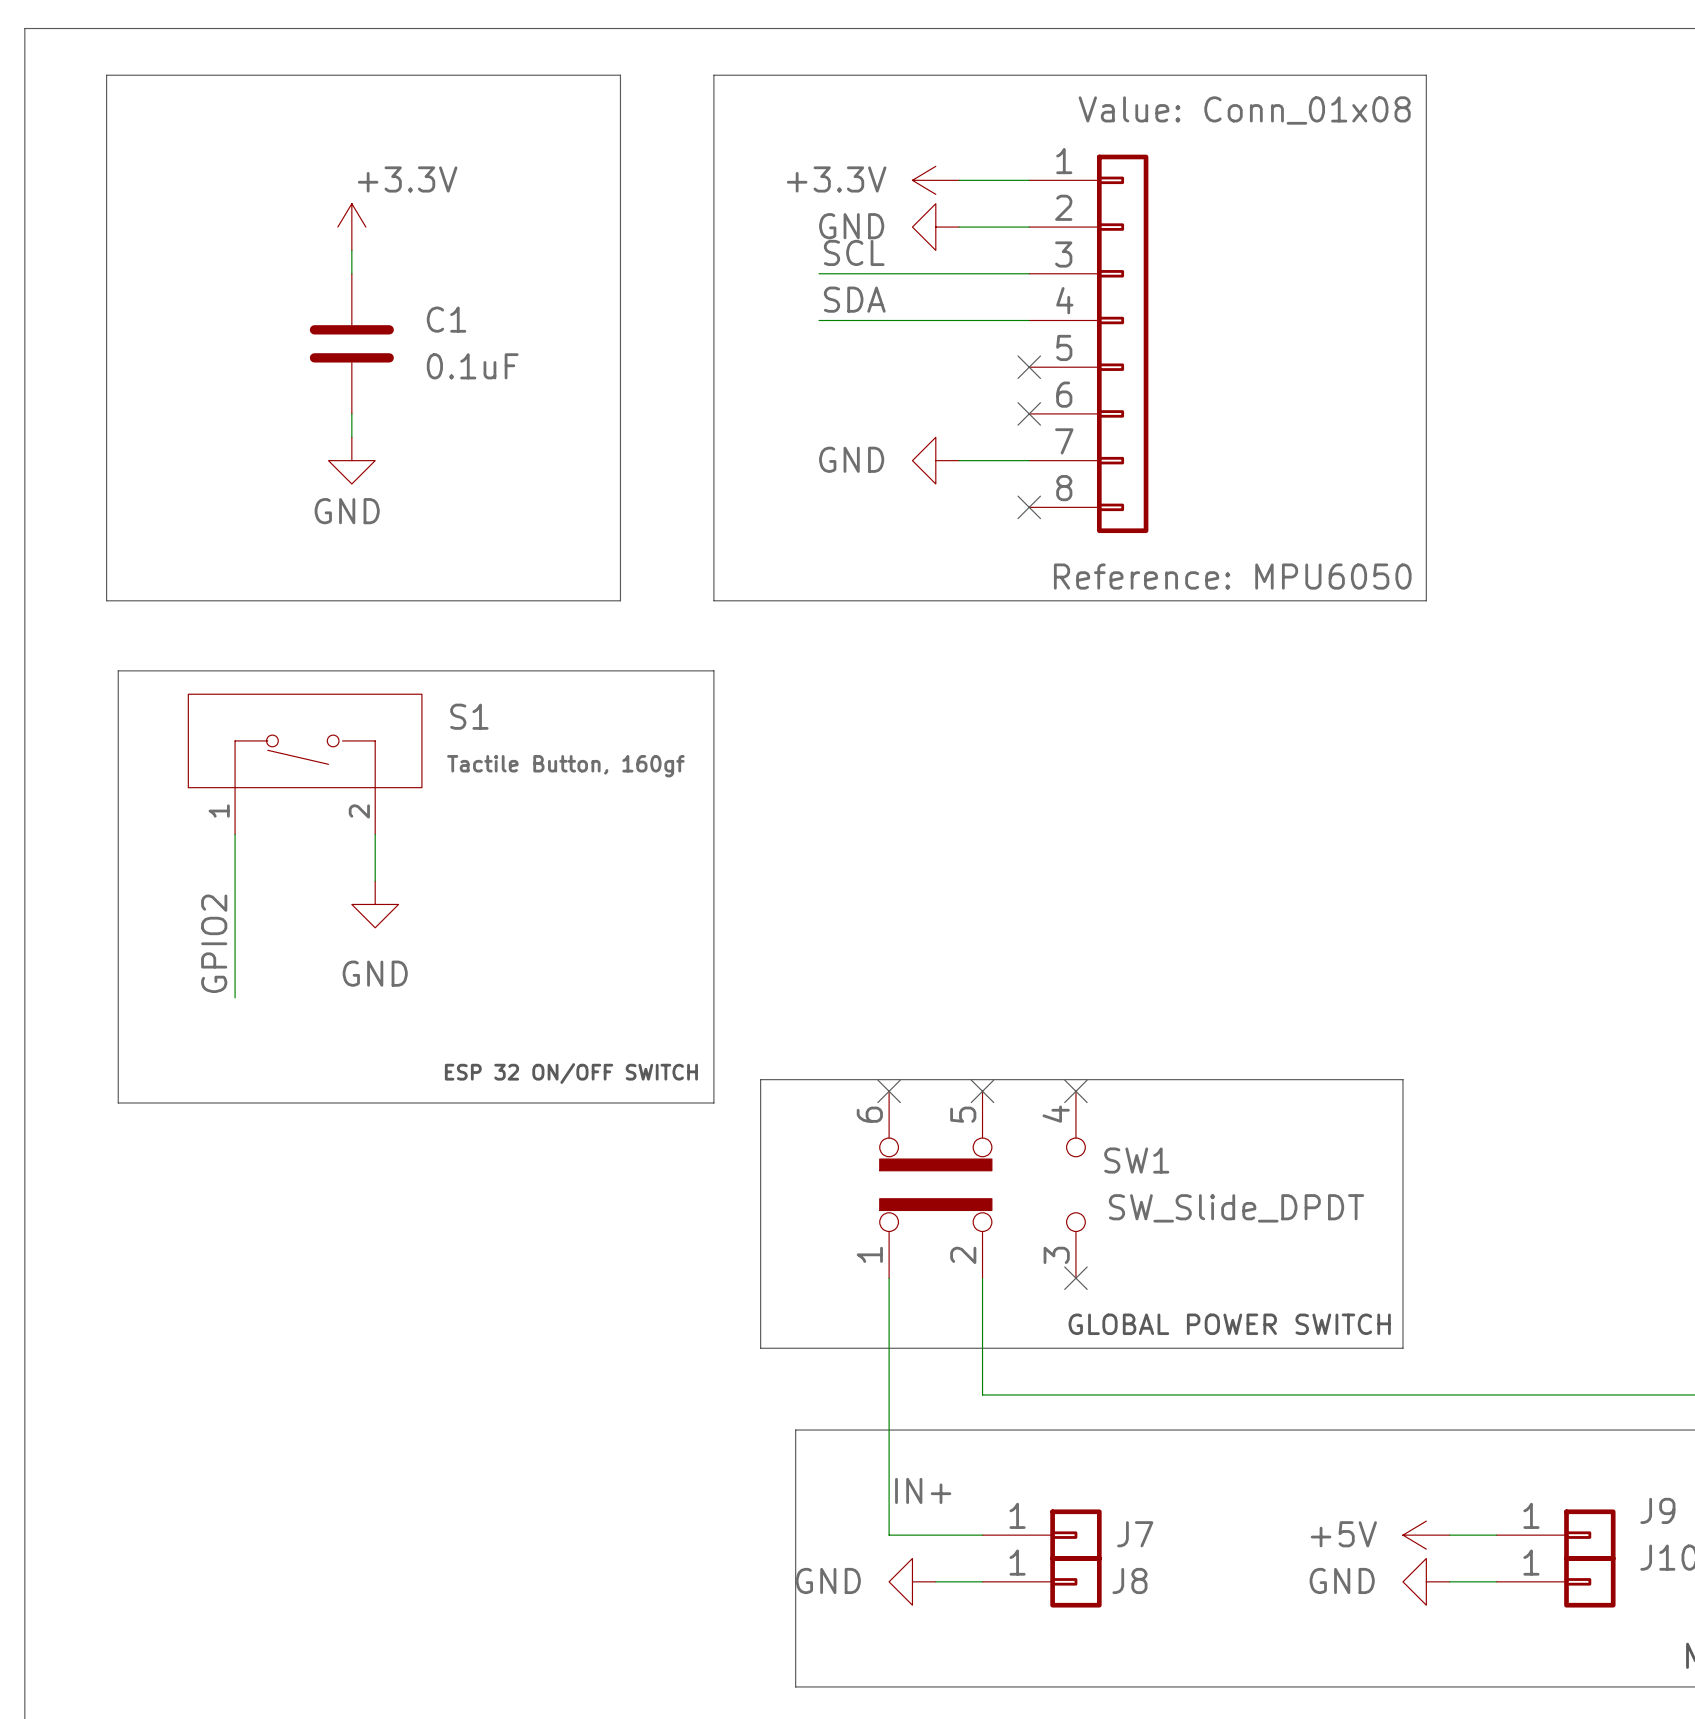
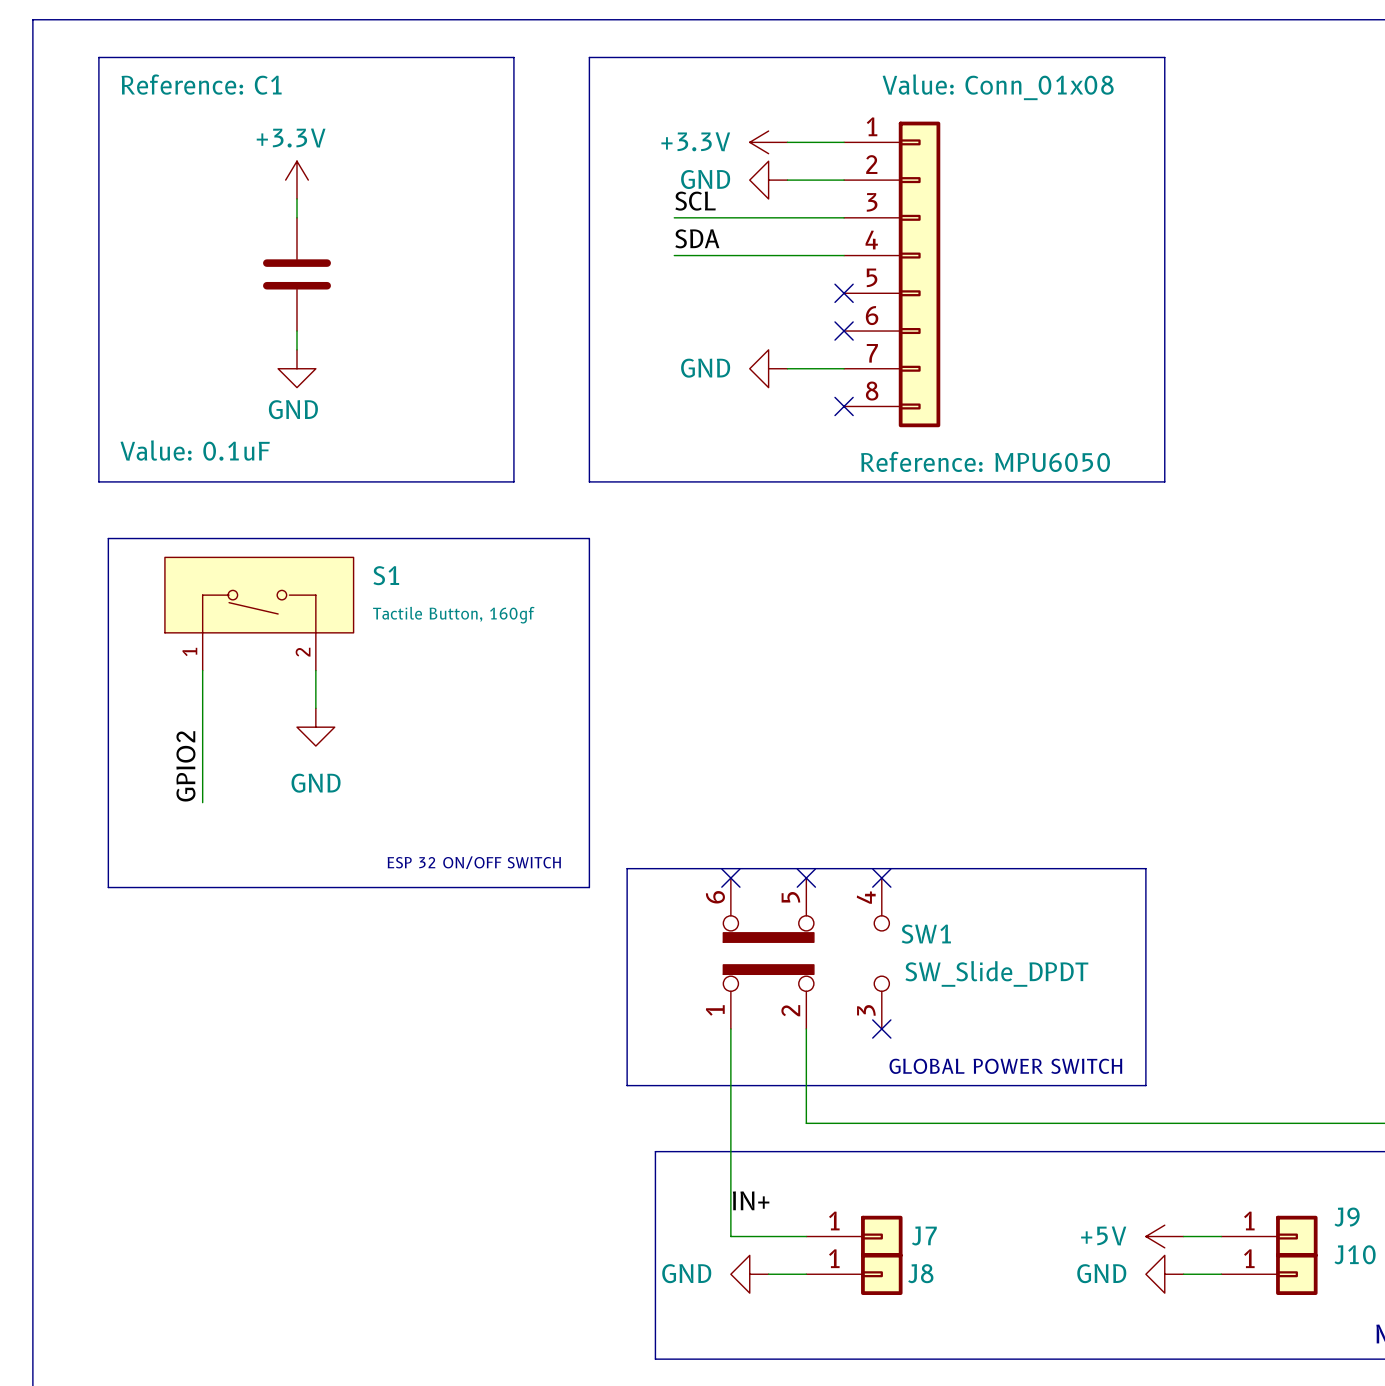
power symbol text position: +3.3V (407, 179) -> +3.3V (291, 138)
C1 name: C1 (446, 319) -> Reference: C1 (201, 84)
C1 value: 0.1uF (472, 366) -> Value: 0.1uF (195, 450)

